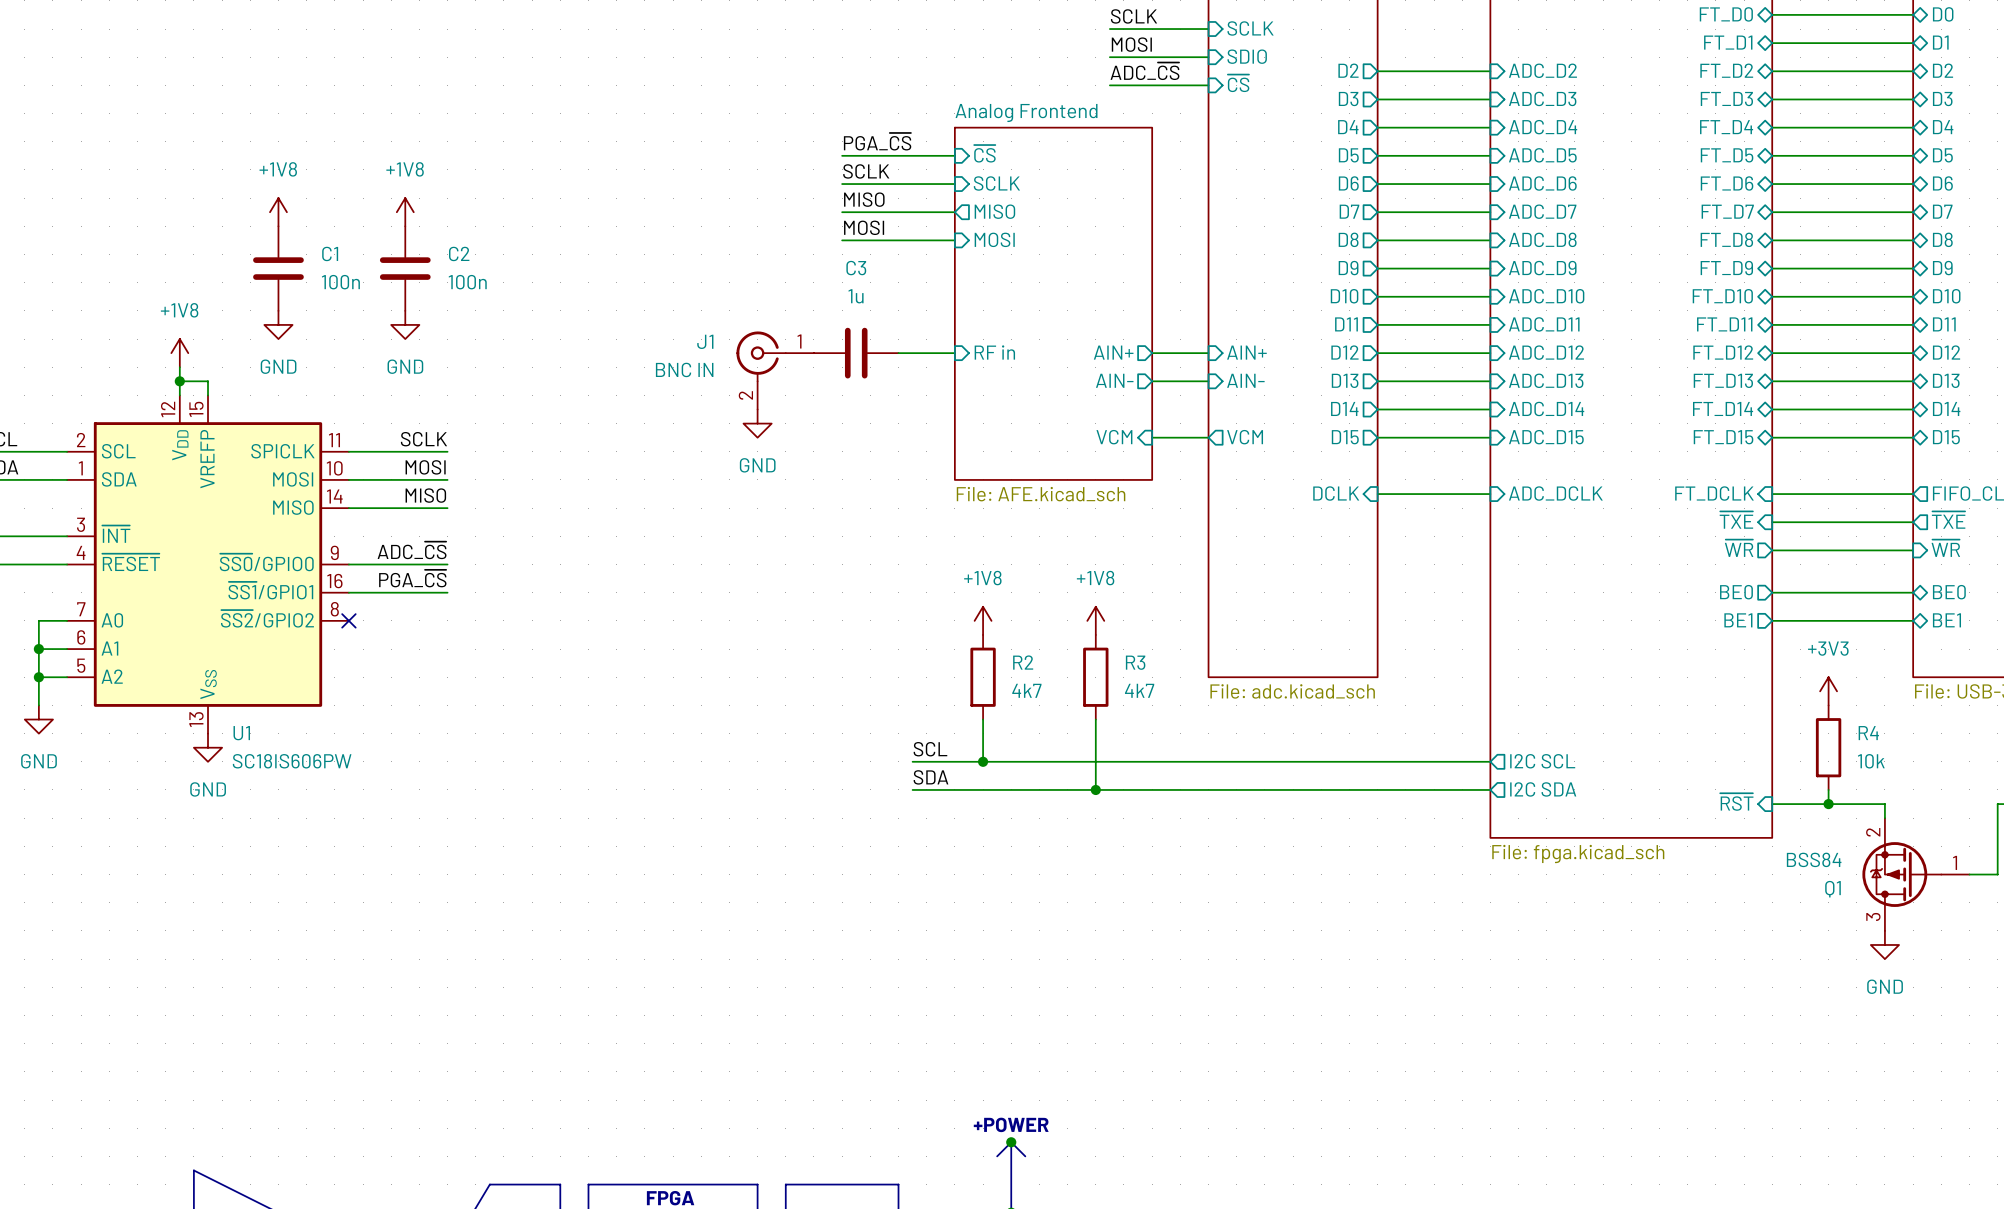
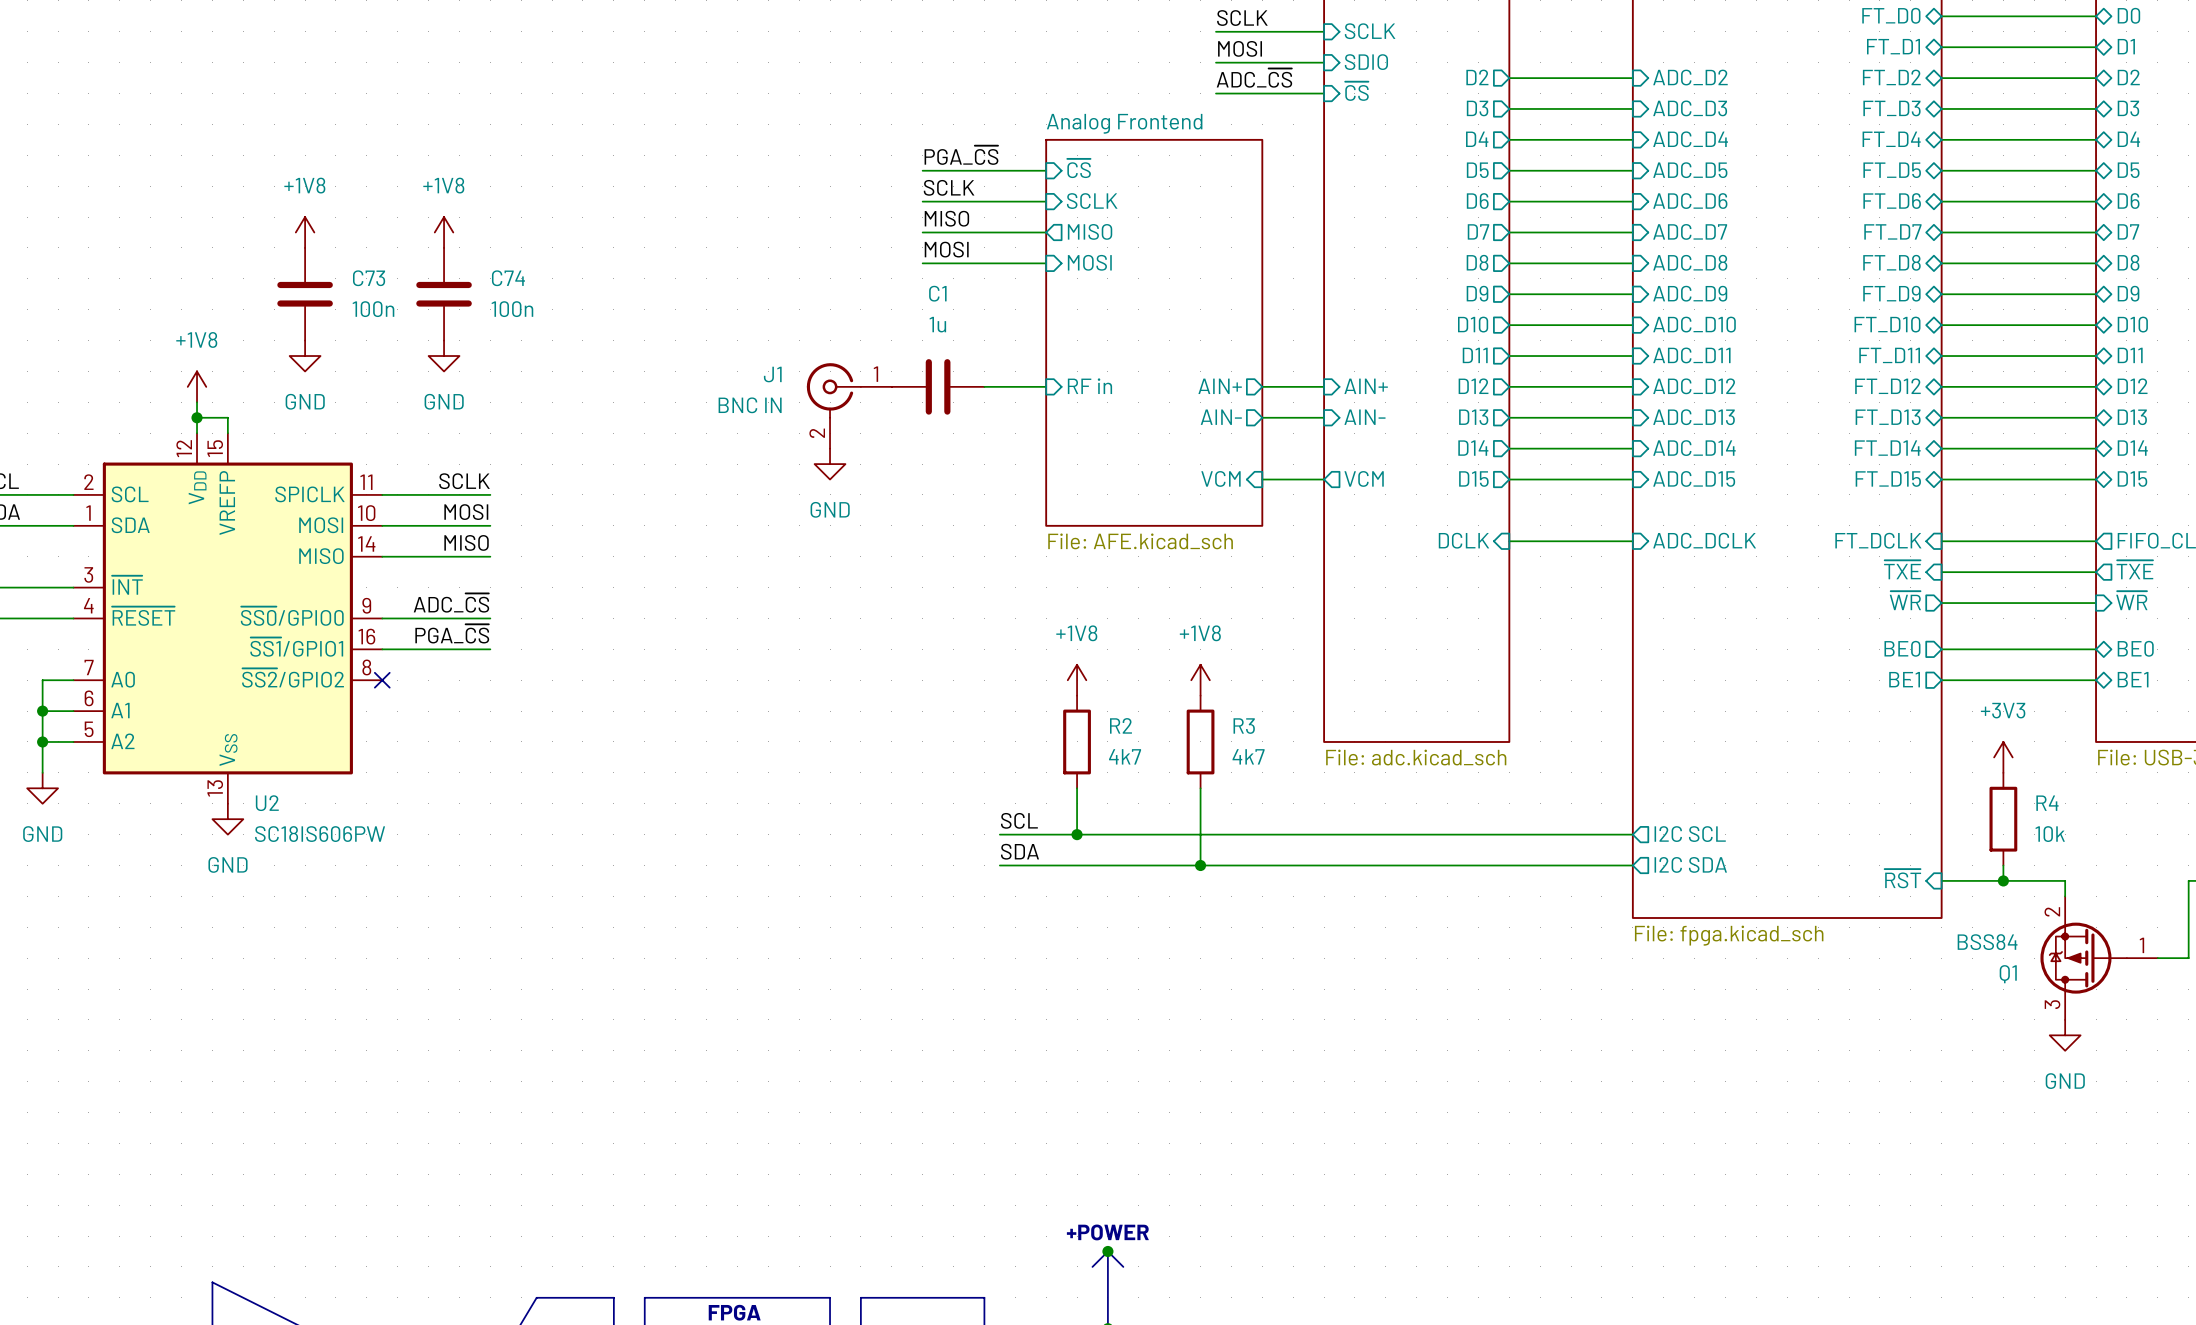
C1 name: C1 (330, 253) -> C73 (369, 278)
C2 name: C2 (459, 253) -> C74 (508, 278)
C3 name: C3 (856, 268) -> C1 (937, 293)
U1 name: U1 (241, 733) -> U2 (267, 803)

